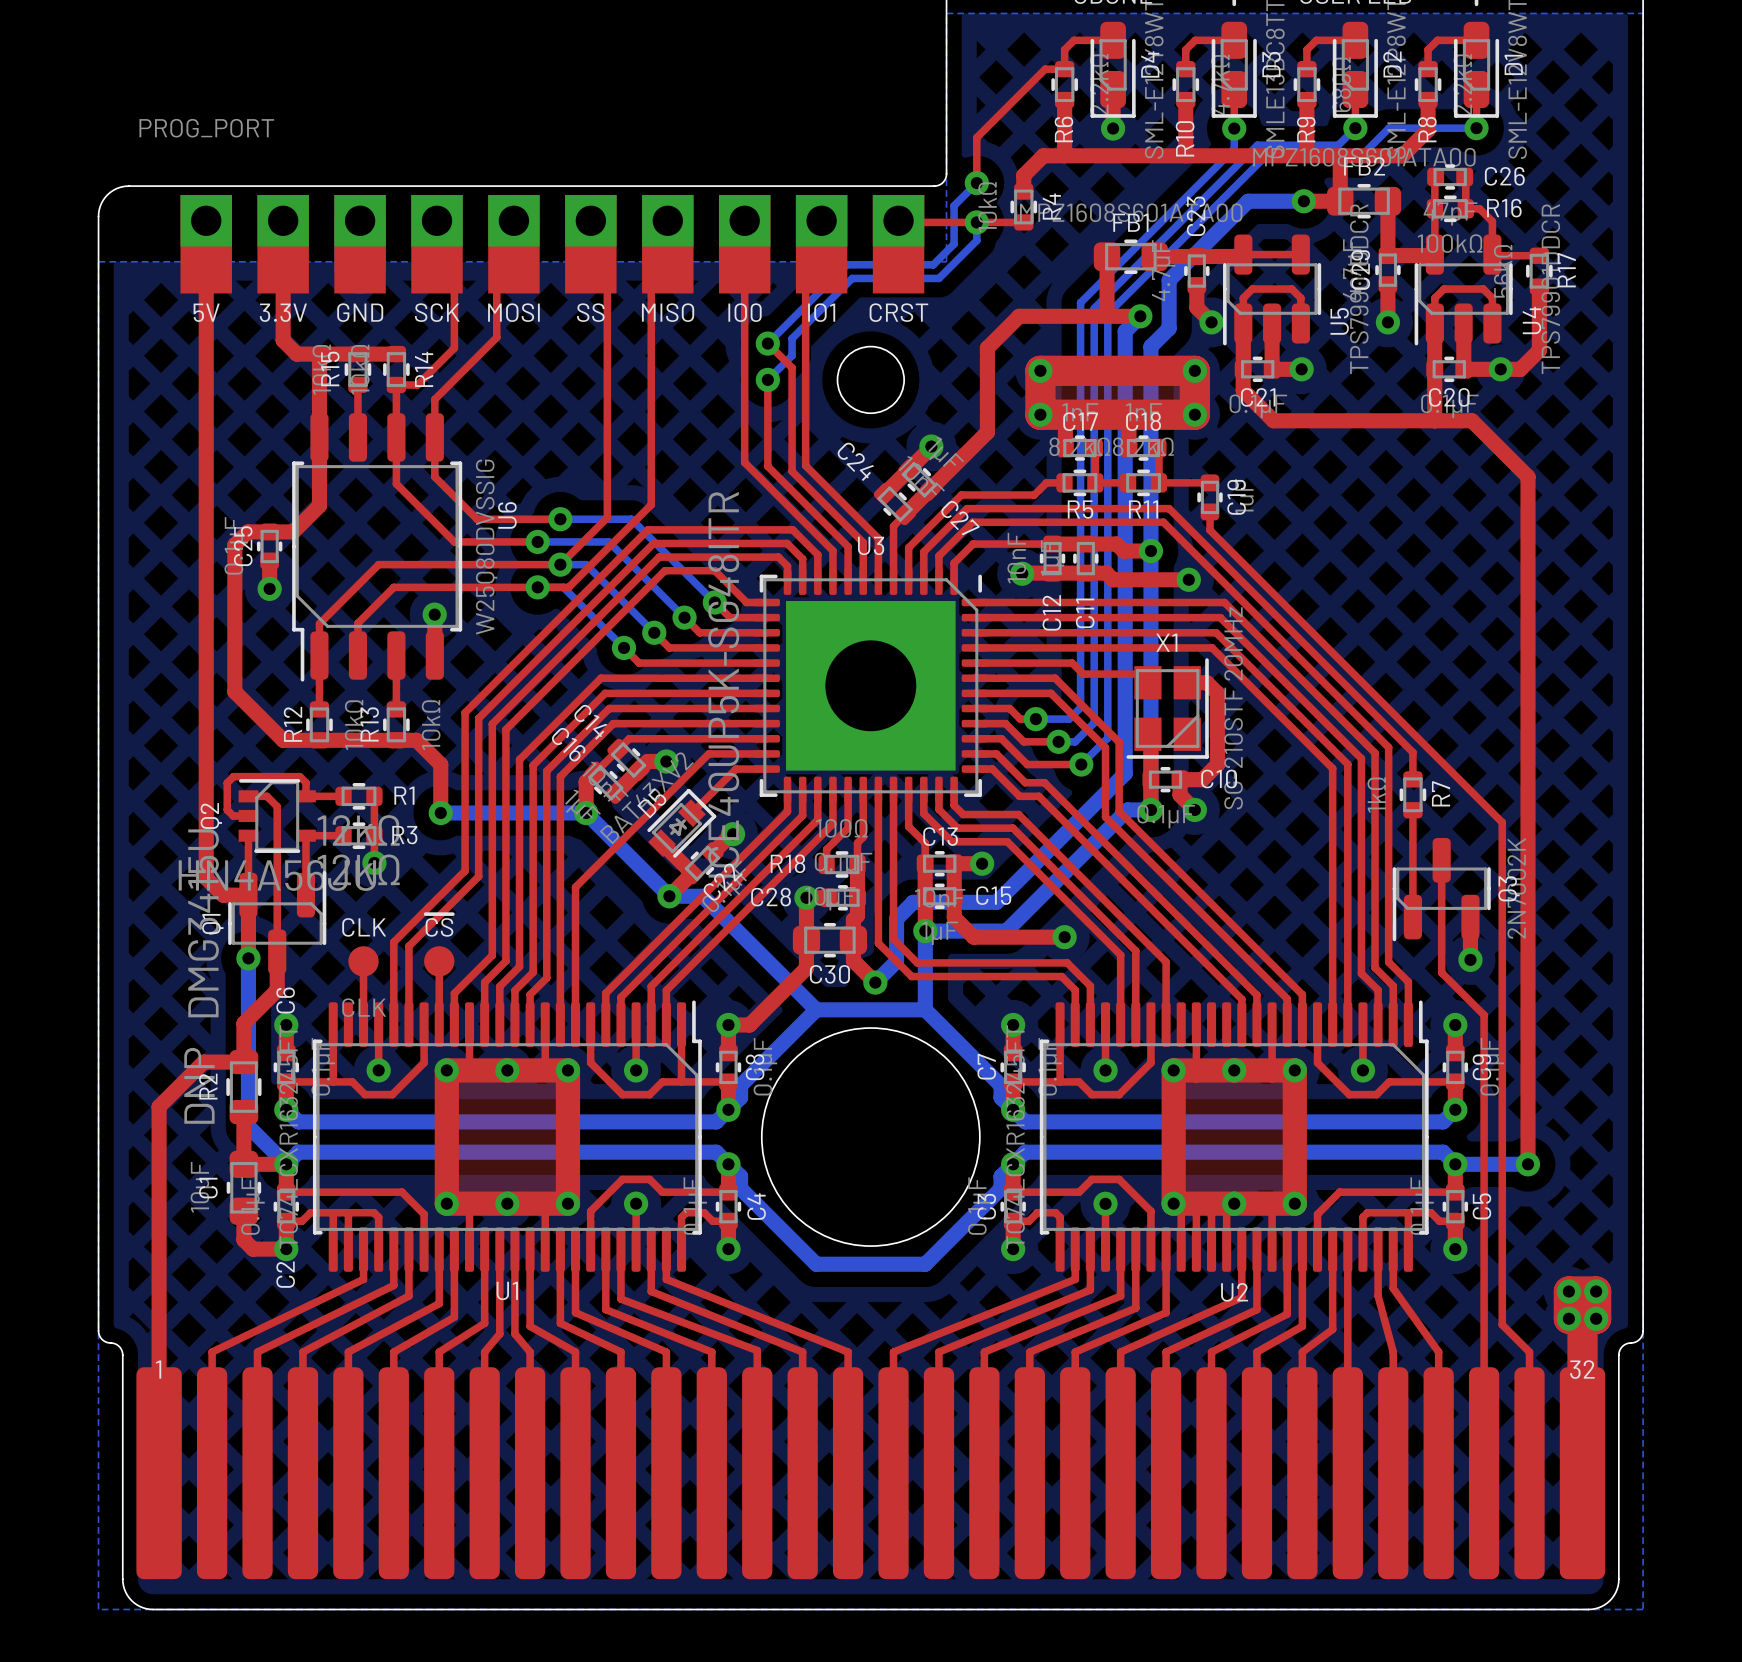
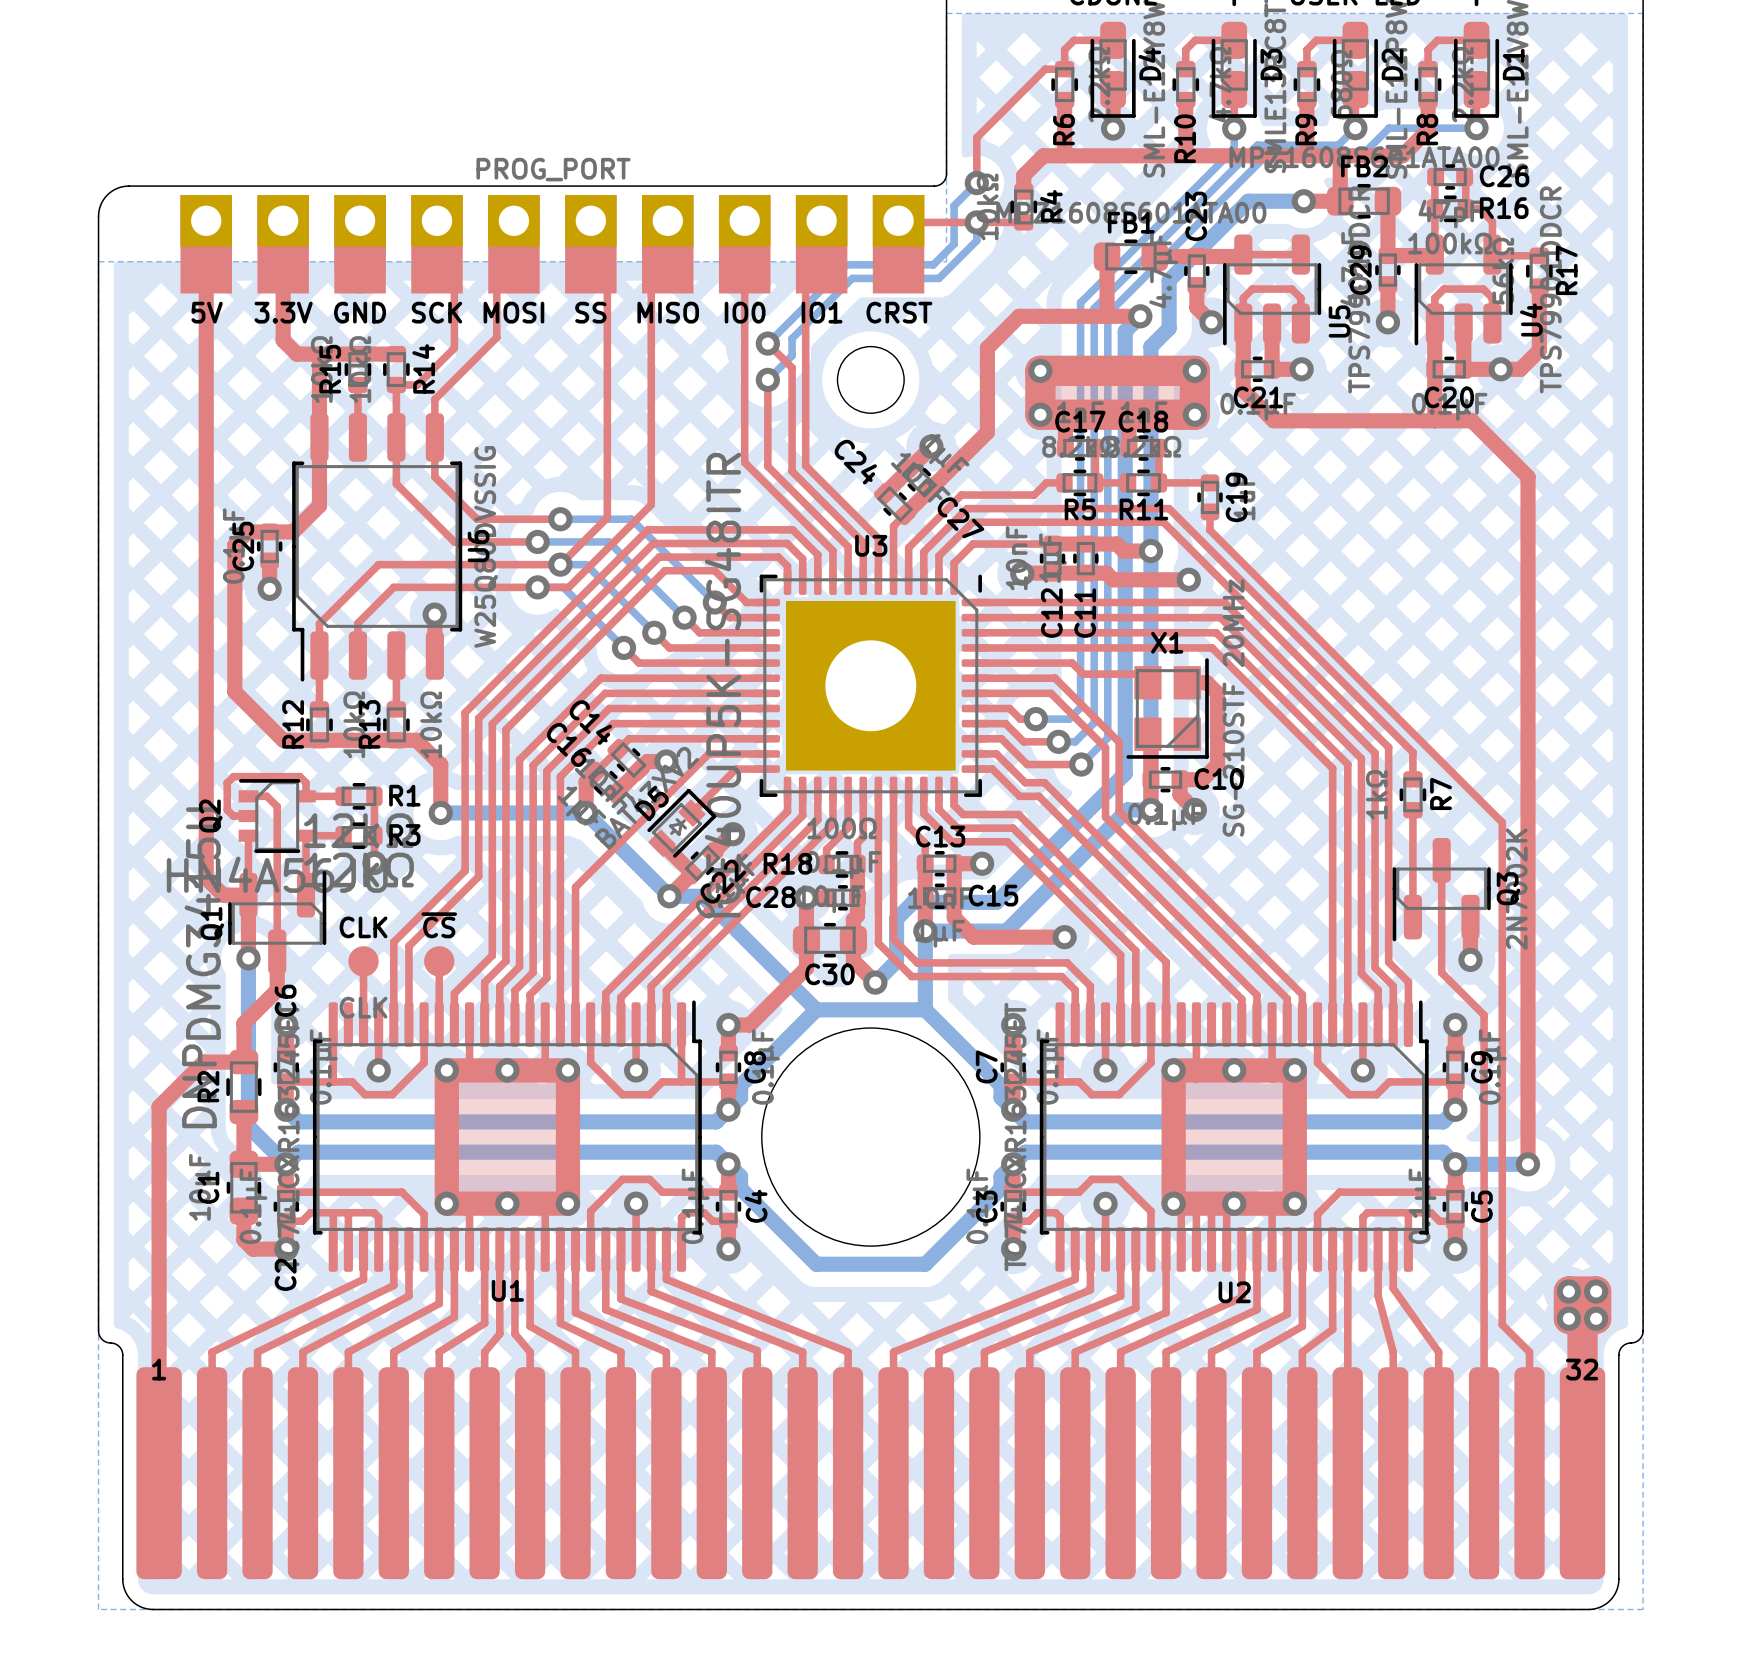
part value position: PROG_PORT (206, 128) -> PROG_PORT (553, 169)
U6 name position: U6 (507, 515) -> U6 (478, 546)

